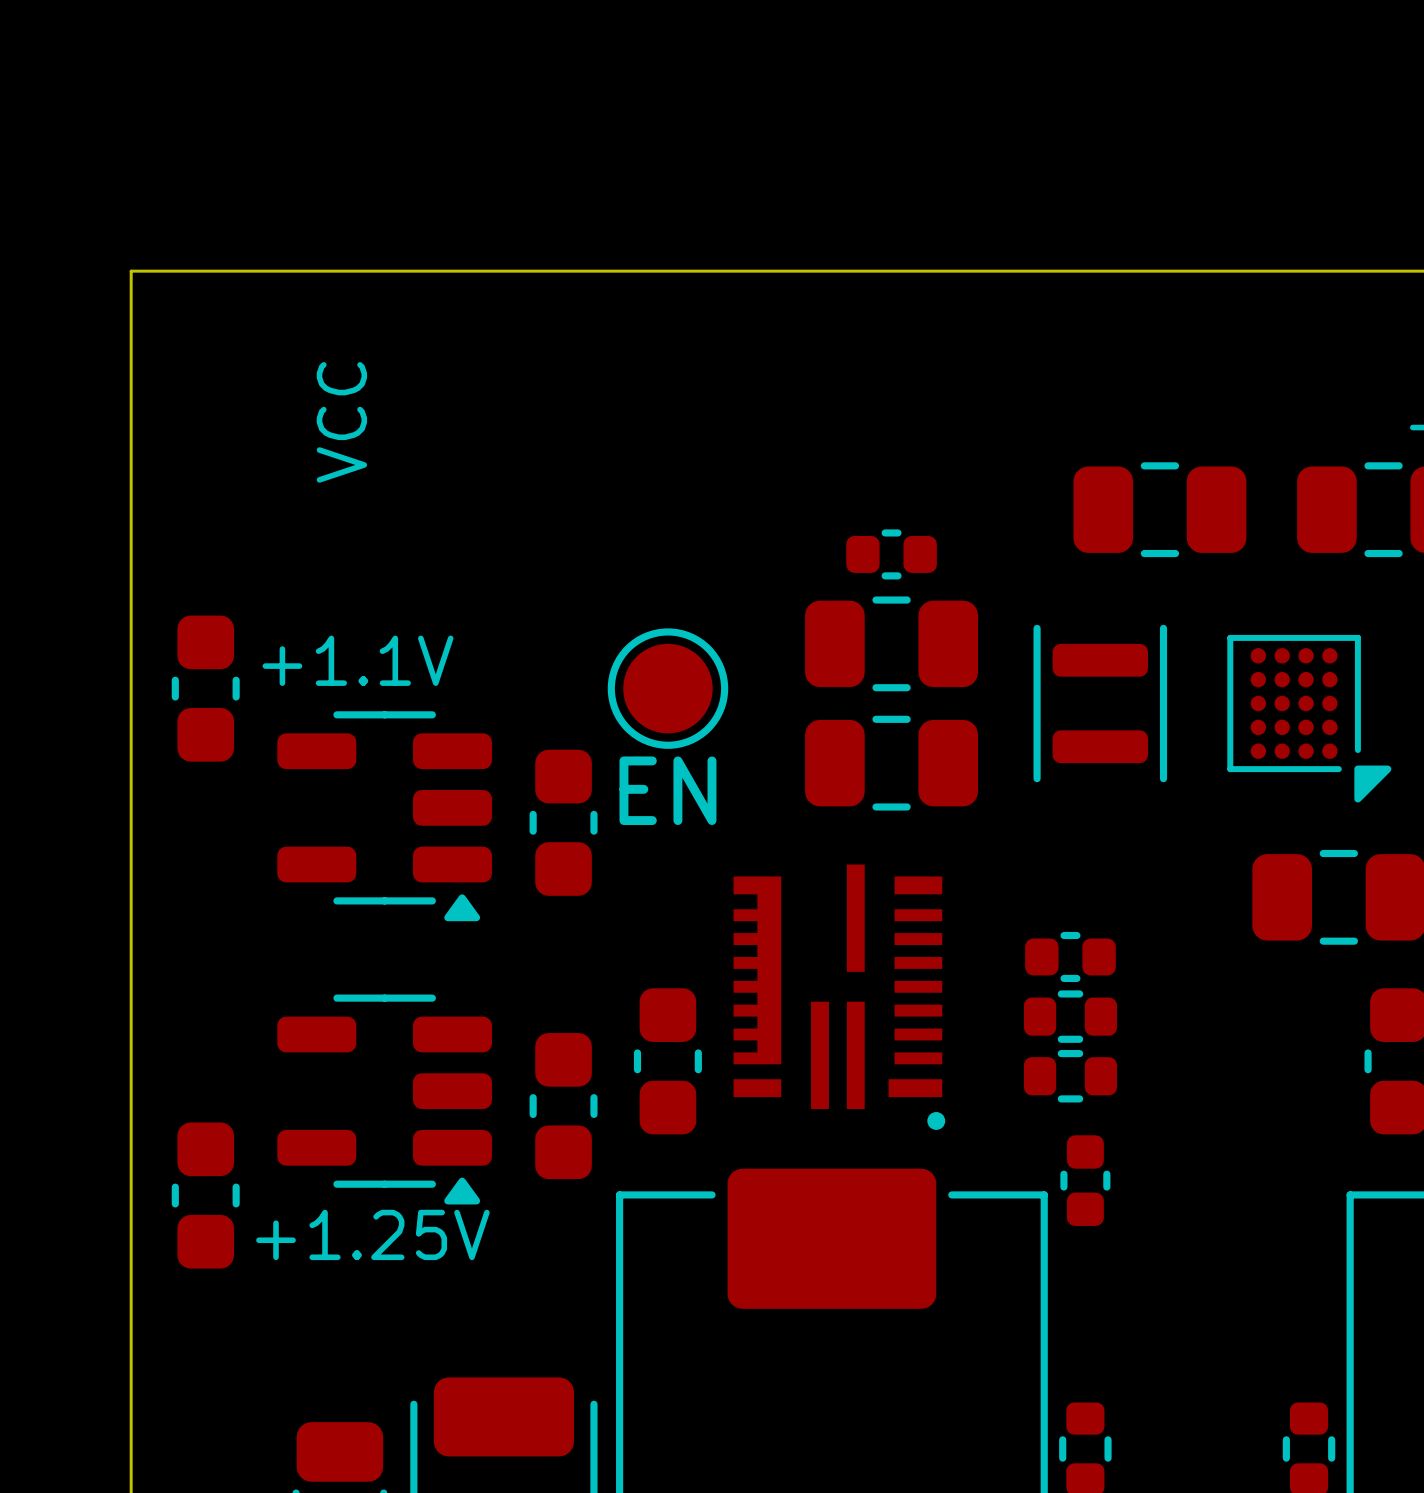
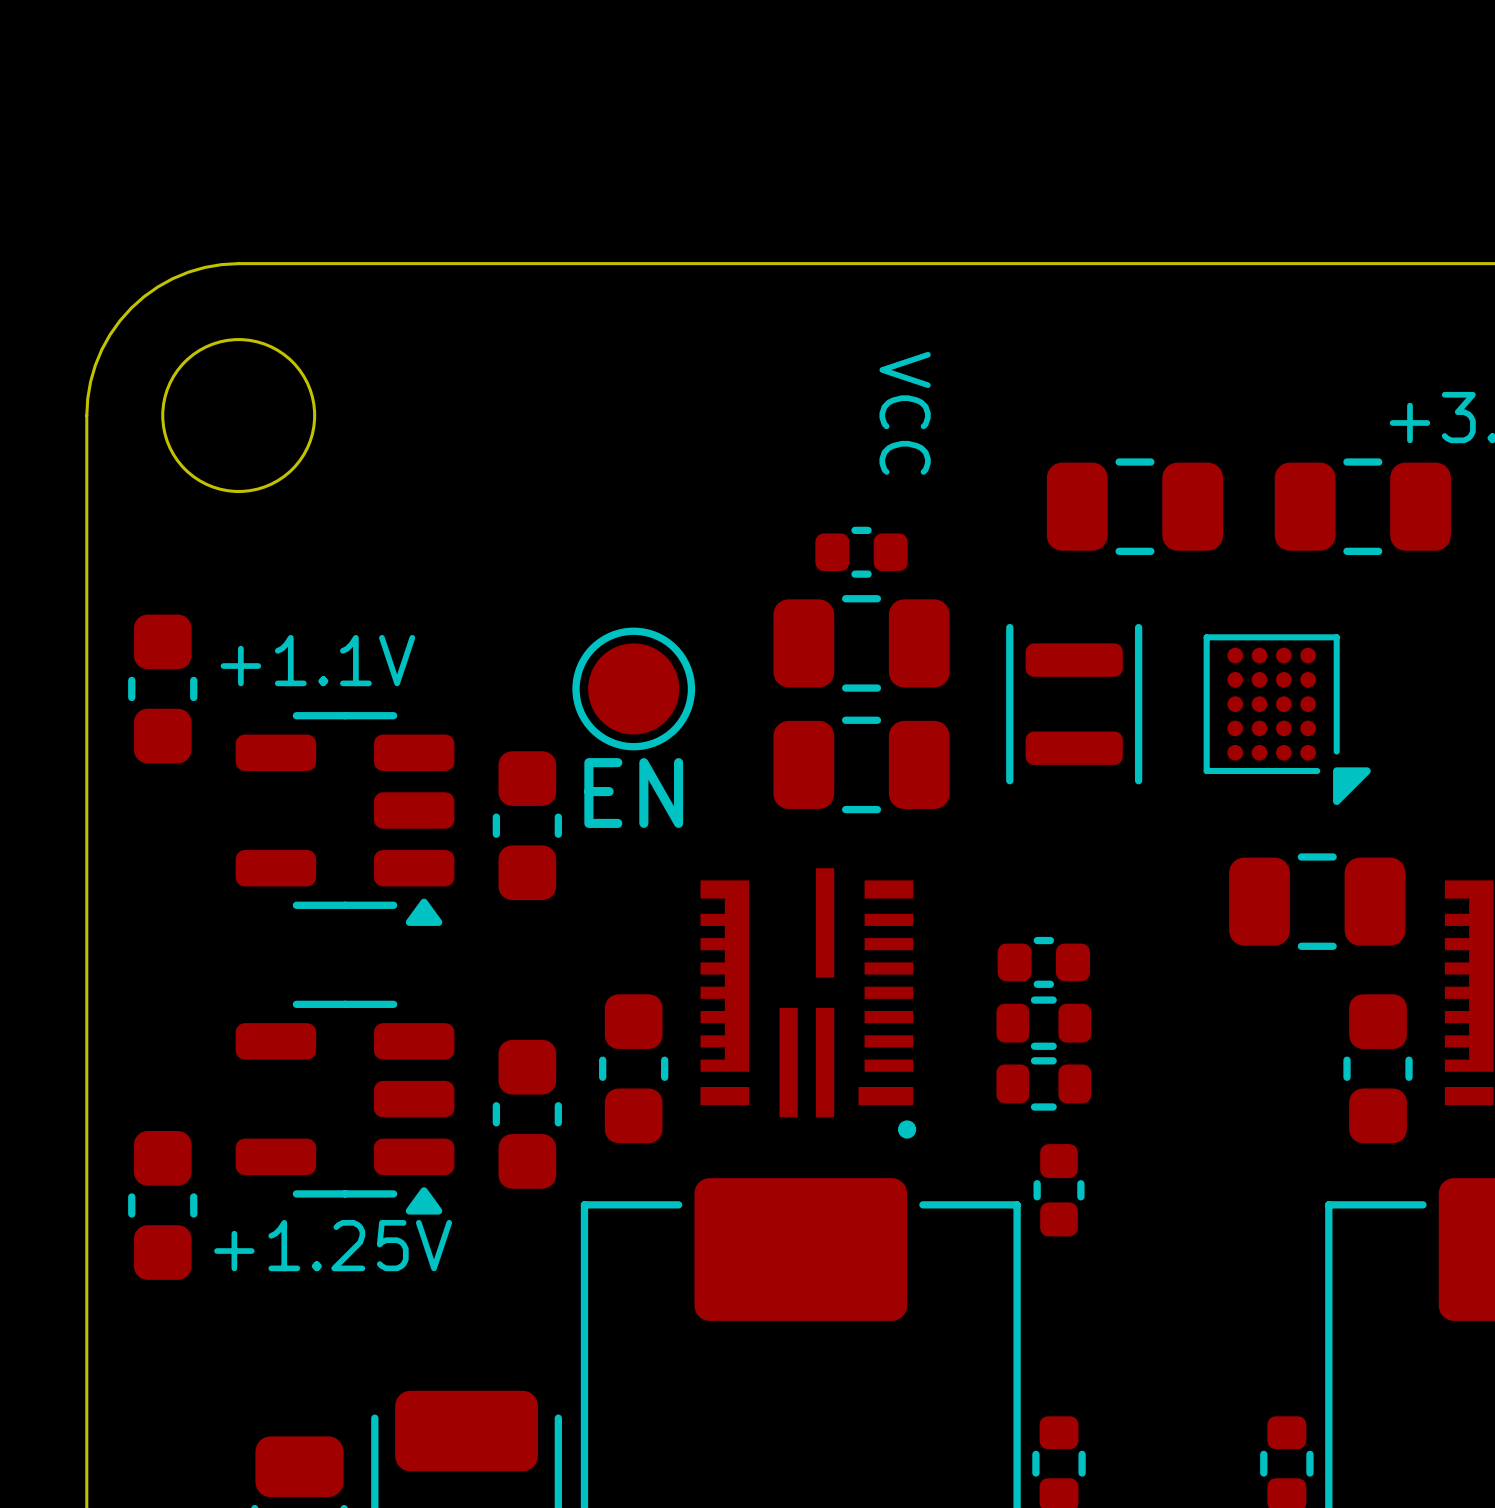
board edge: (280, 271) (131, 271) (131, 420) -> (238, 263) (204, 267) (172, 278) (157, 286) (131, 308) (119, 320) (101, 349) (90, 381) (86, 415)
round board edge: none -> [161, 338, 317, 494]
text rotation: 0° (341, 422) -> 180° (905, 413)
text position: VCC (341, 422) -> VCC (905, 413)

